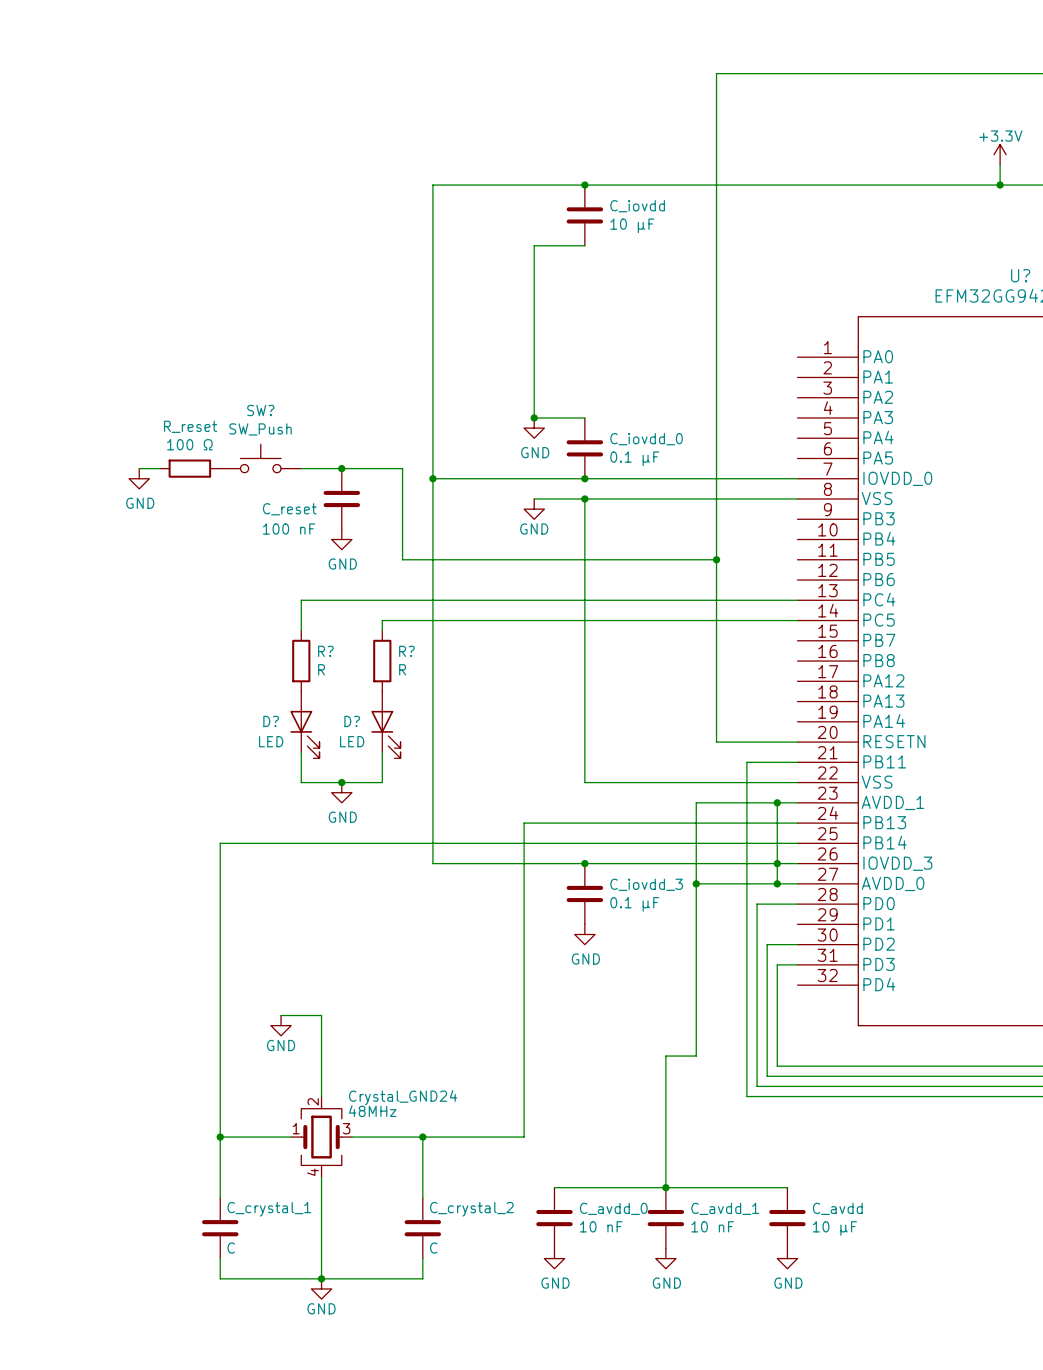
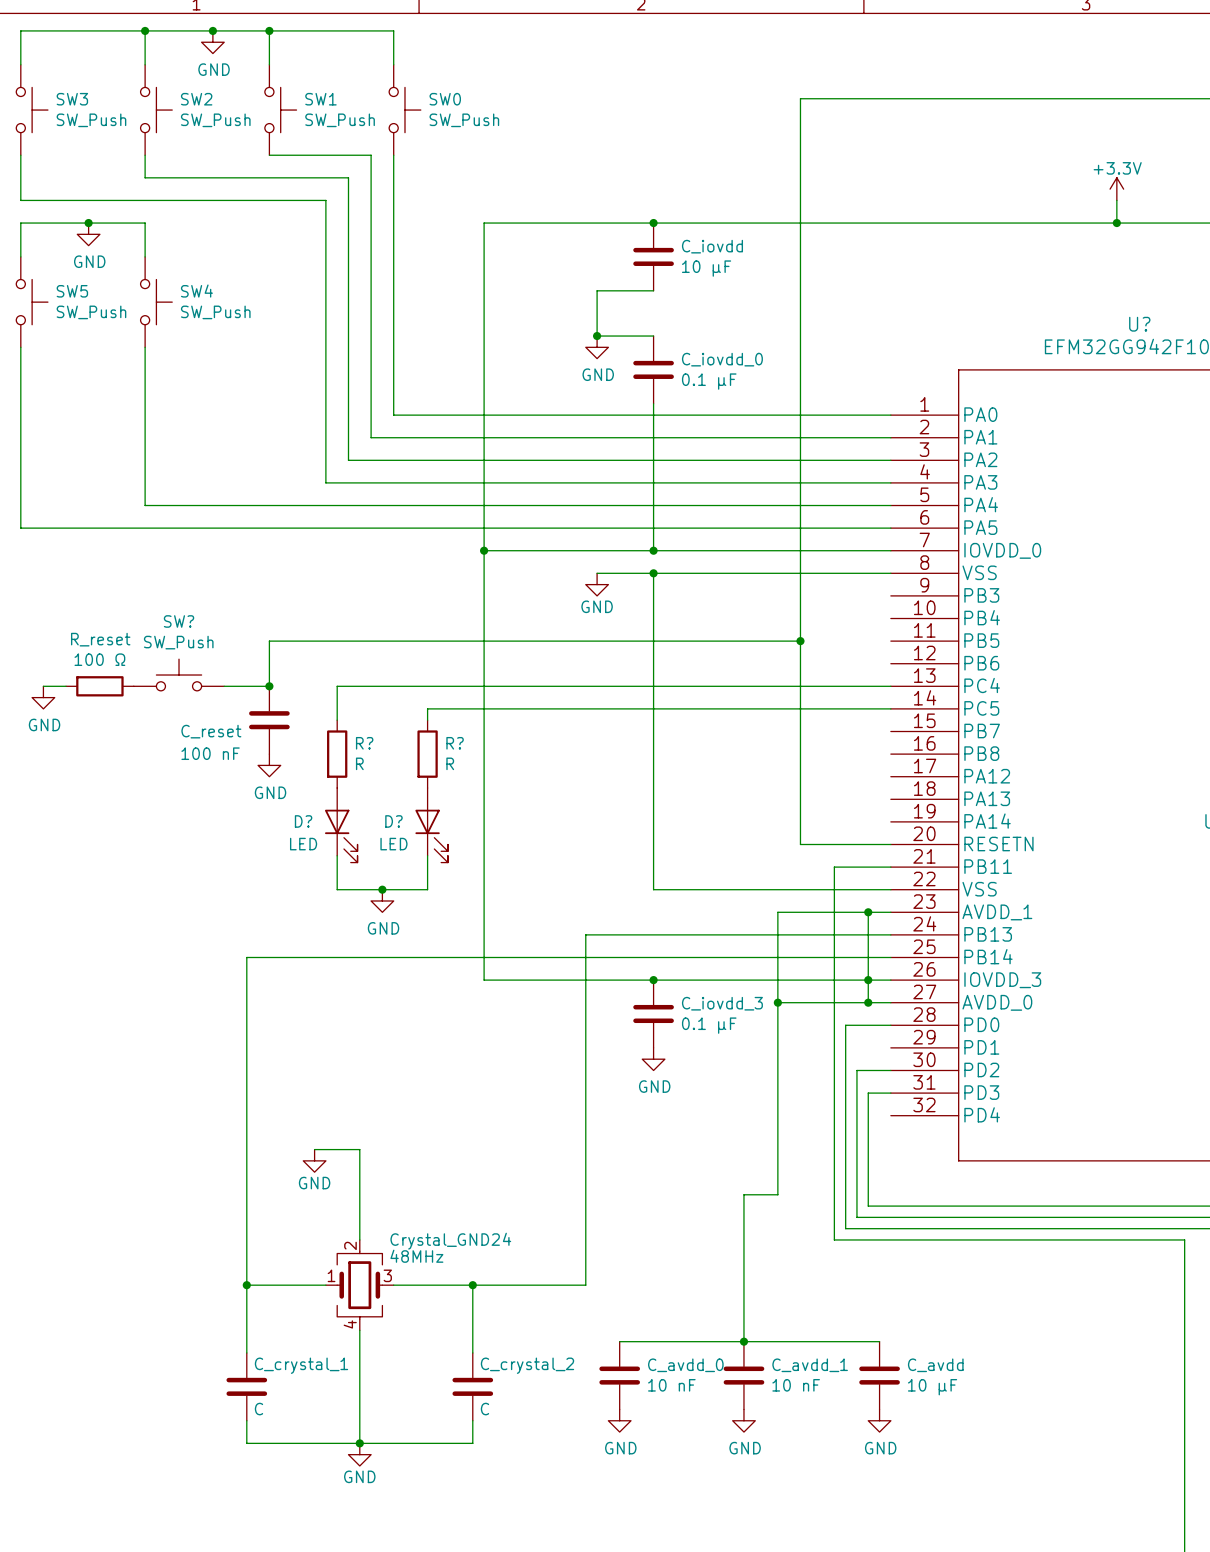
wire: none -> (145, 30) (145, 64)
junction: none -> (145, 30)
junction: none -> (212, 30)
wire: none -> (269, 30) (269, 64)
junction: none -> (269, 30)
power symbol: none -> GND (212, 42)
wire: none -> (20, 64) (20, 30) (393, 30) (393, 64)
SW3: none -> SW_Push (32, 110)
SW2: none -> SW_Push (156, 110)
SW1: none -> SW_Push (280, 110)
SW0: none -> SW_Push (404, 110)
wire: none -> (20, 155) (20, 200) (325, 200) (325, 482) (597, 482)
wire: none -> (145, 155) (145, 177) (348, 177) (348, 460) (890, 460)
wire: none -> (269, 155) (371, 155) (371, 437) (890, 437)
wire: none -> (393, 155) (393, 415) (890, 415)
junction: none -> (88, 223)
power symbol: none -> GND (88, 234)
wire: none -> (20, 256) (20, 223) (145, 223) (145, 256)
SW5: none -> SW_Push (32, 302)
SW4: none -> SW_Push (156, 302)
wire: (534, 286) (534, 417) -> (597, 336) (653, 336)
junction: none -> (597, 336)
wire: none -> (20, 347) (20, 528) (890, 528)
wire: none -> (145, 347) (145, 505) (890, 505)
wire: none -> (653, 403) (653, 550)
junction: (534, 417) -> none
wire: none -> (653, 482) (890, 482)
power symbol position: GND (534, 428) -> GND (597, 347)
C_iovdd_0 position: (584, 448) -> (653, 369)
SW? position: (260, 458) -> (179, 675)
wire: (139, 468) (159, 468) -> (43, 686) (66, 686)
R_reset position: (189, 468) -> (99, 686)
wire: (301, 468) (402, 468) (402, 559) -> (224, 686) (269, 686) (269, 641) (450, 641)
junction: (341, 468) -> none
power symbol: GND (139, 478) -> none
C_reset position: (341, 499) -> (269, 720)
power symbol: GND (341, 539) -> none
junction: none -> (269, 686)
power symbol: none -> GND (43, 697)
power symbol: none -> GND (269, 765)

